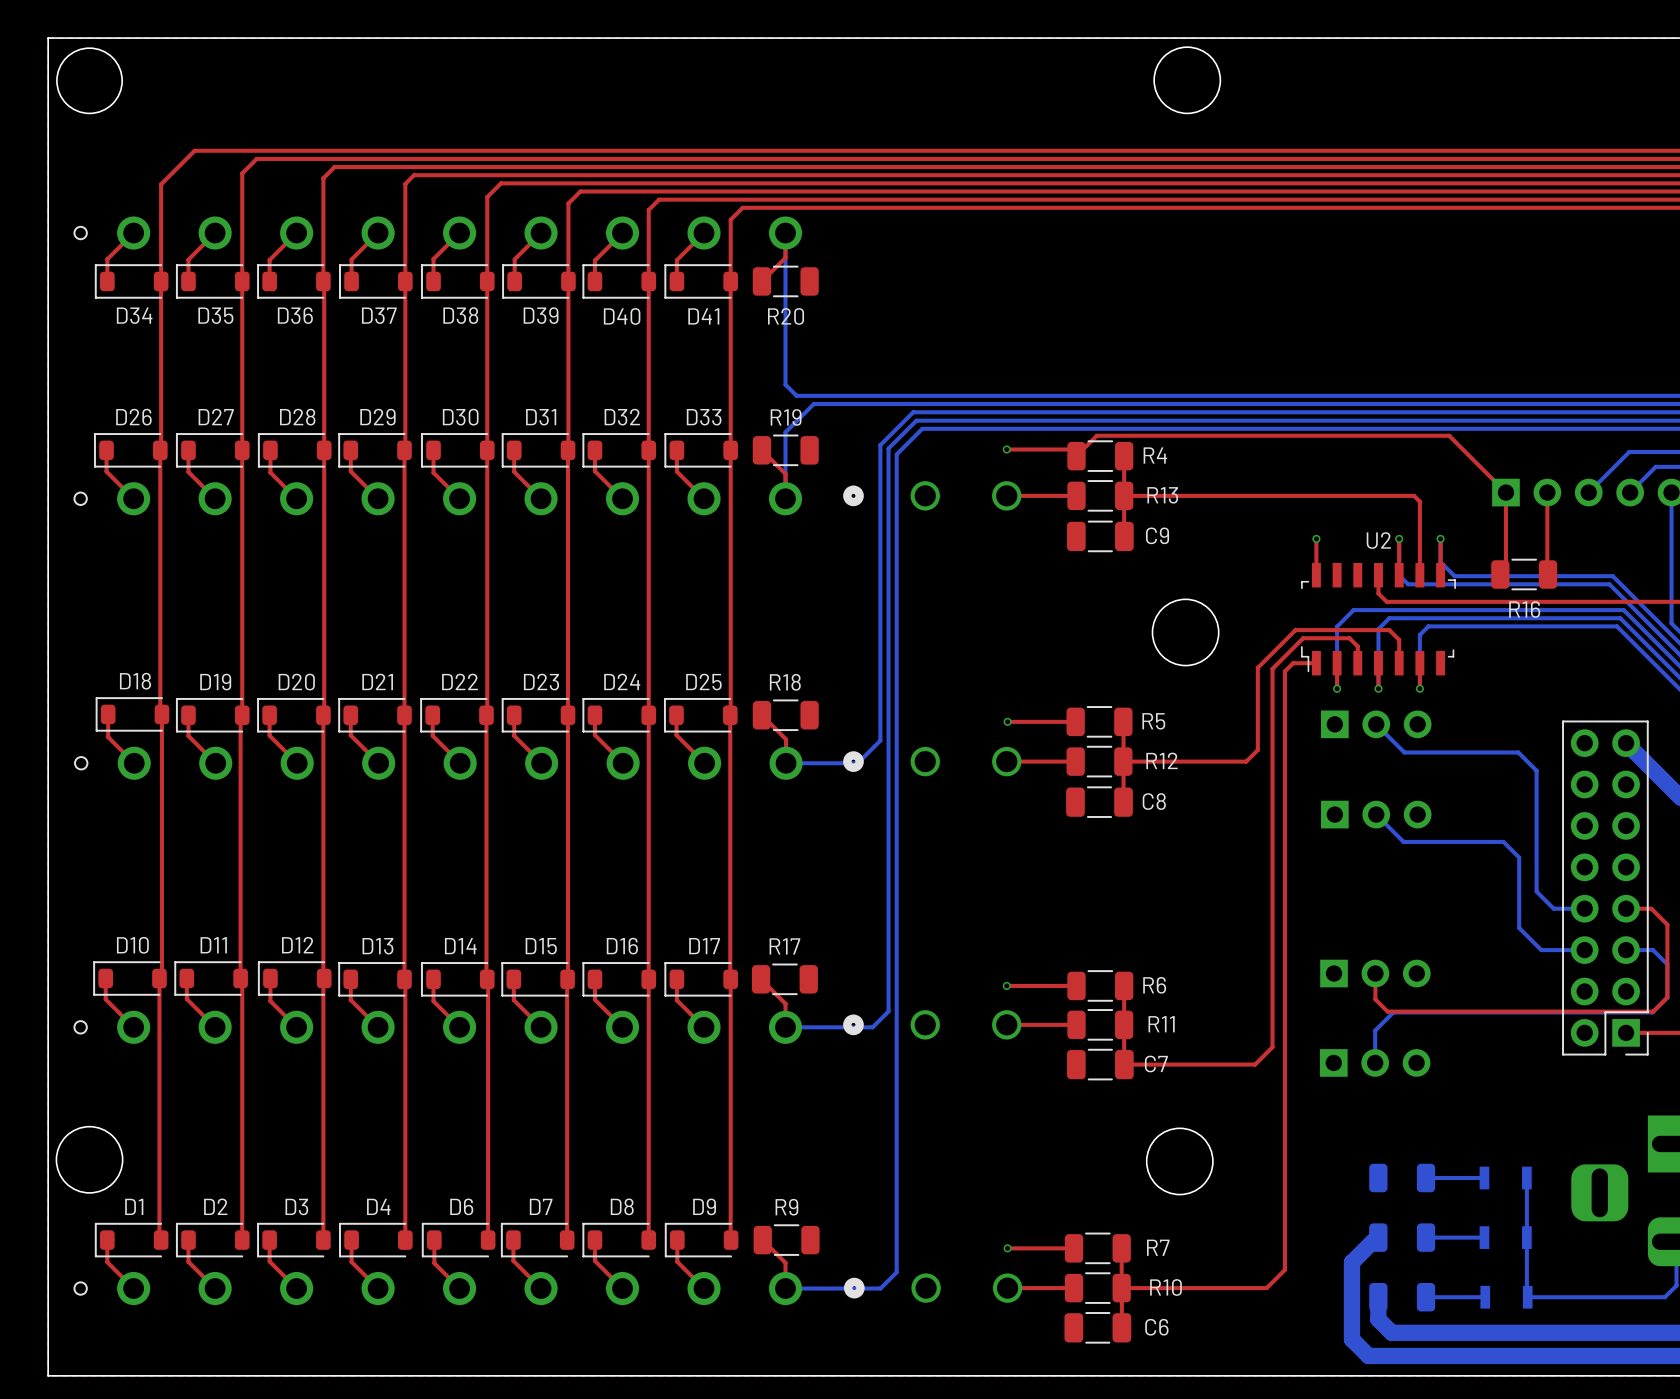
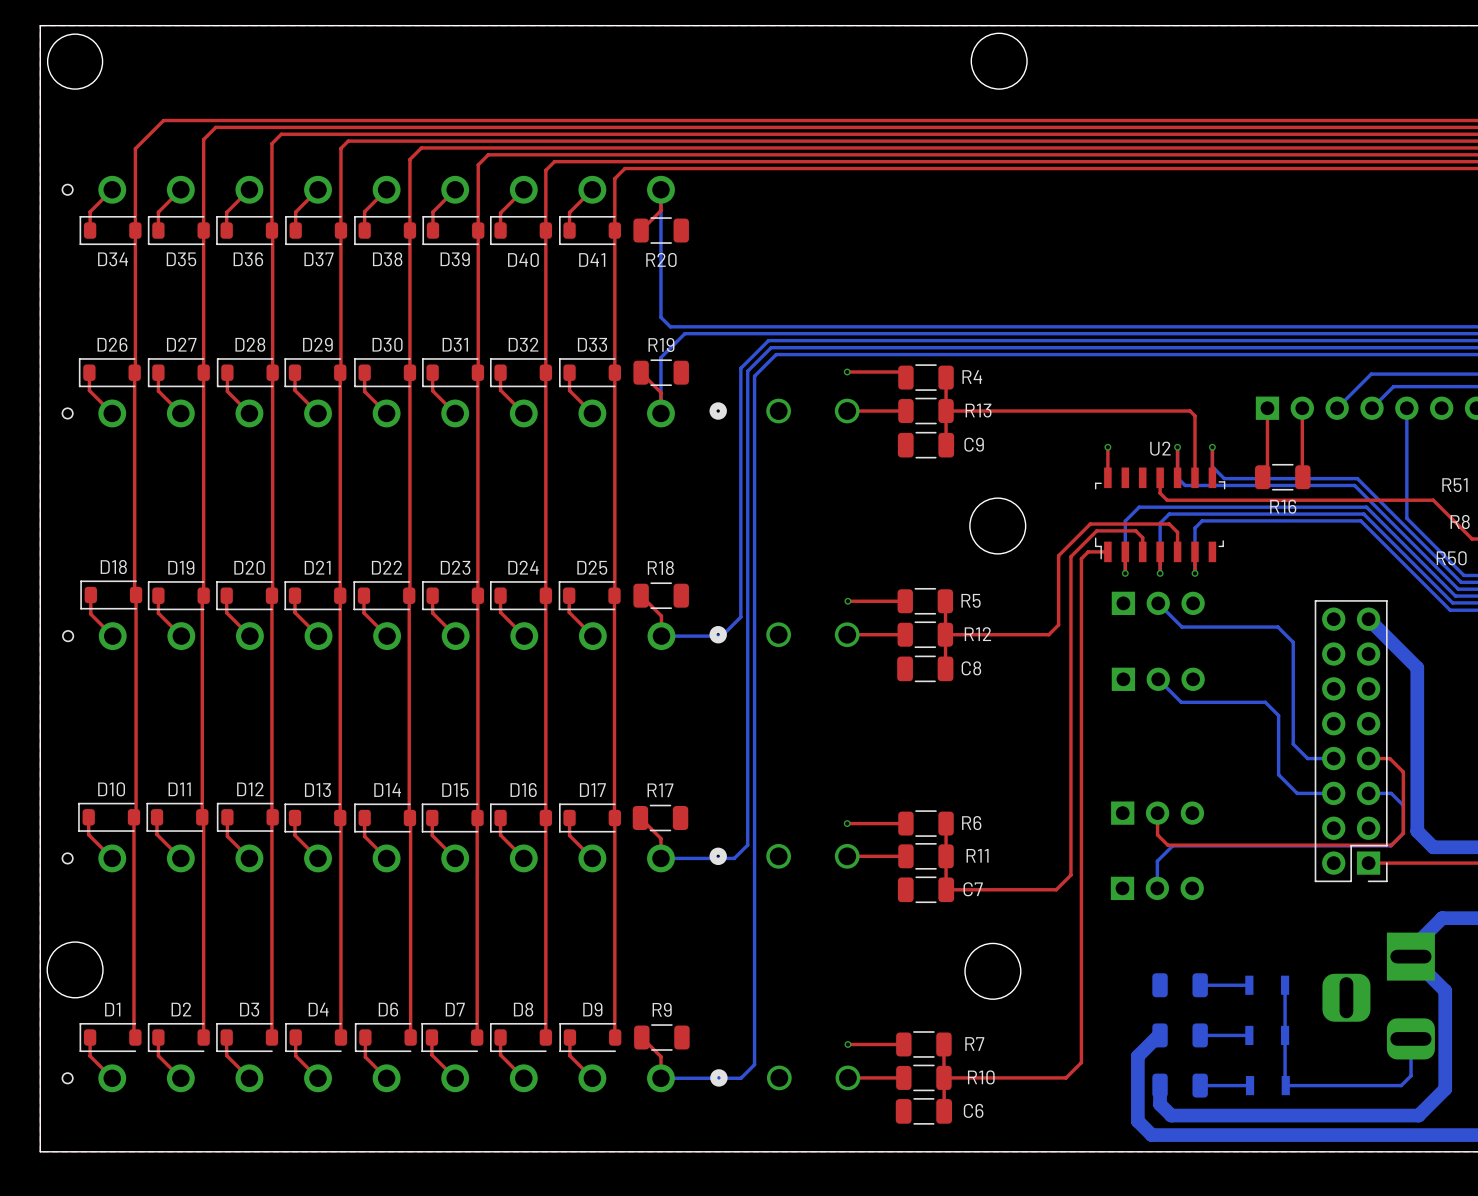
top track: (1076, 456) (1096, 435) (1449, 435) (1505, 492) -> none

